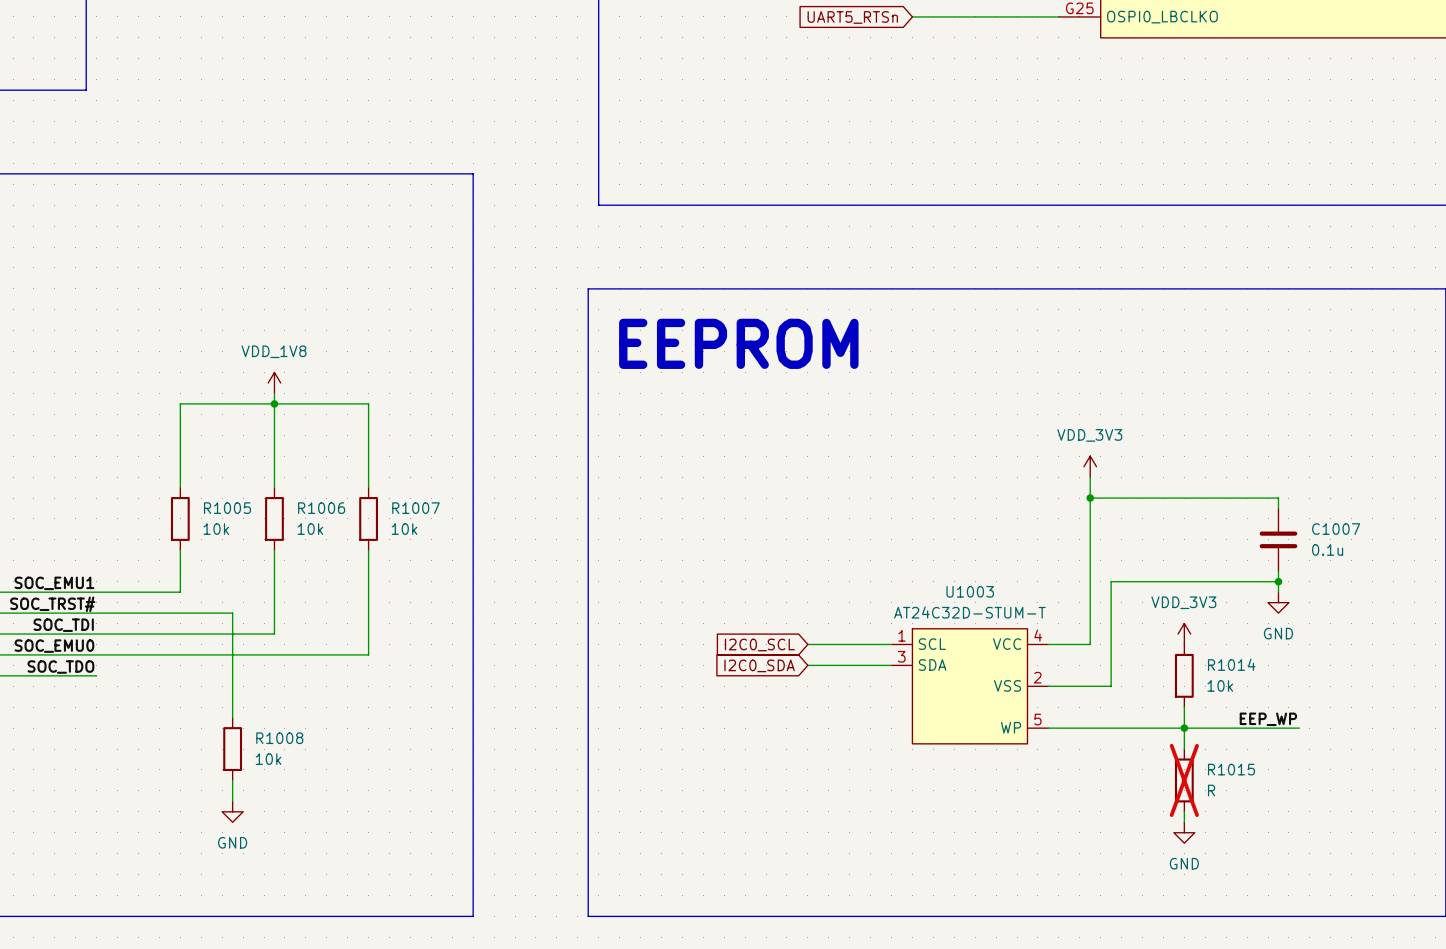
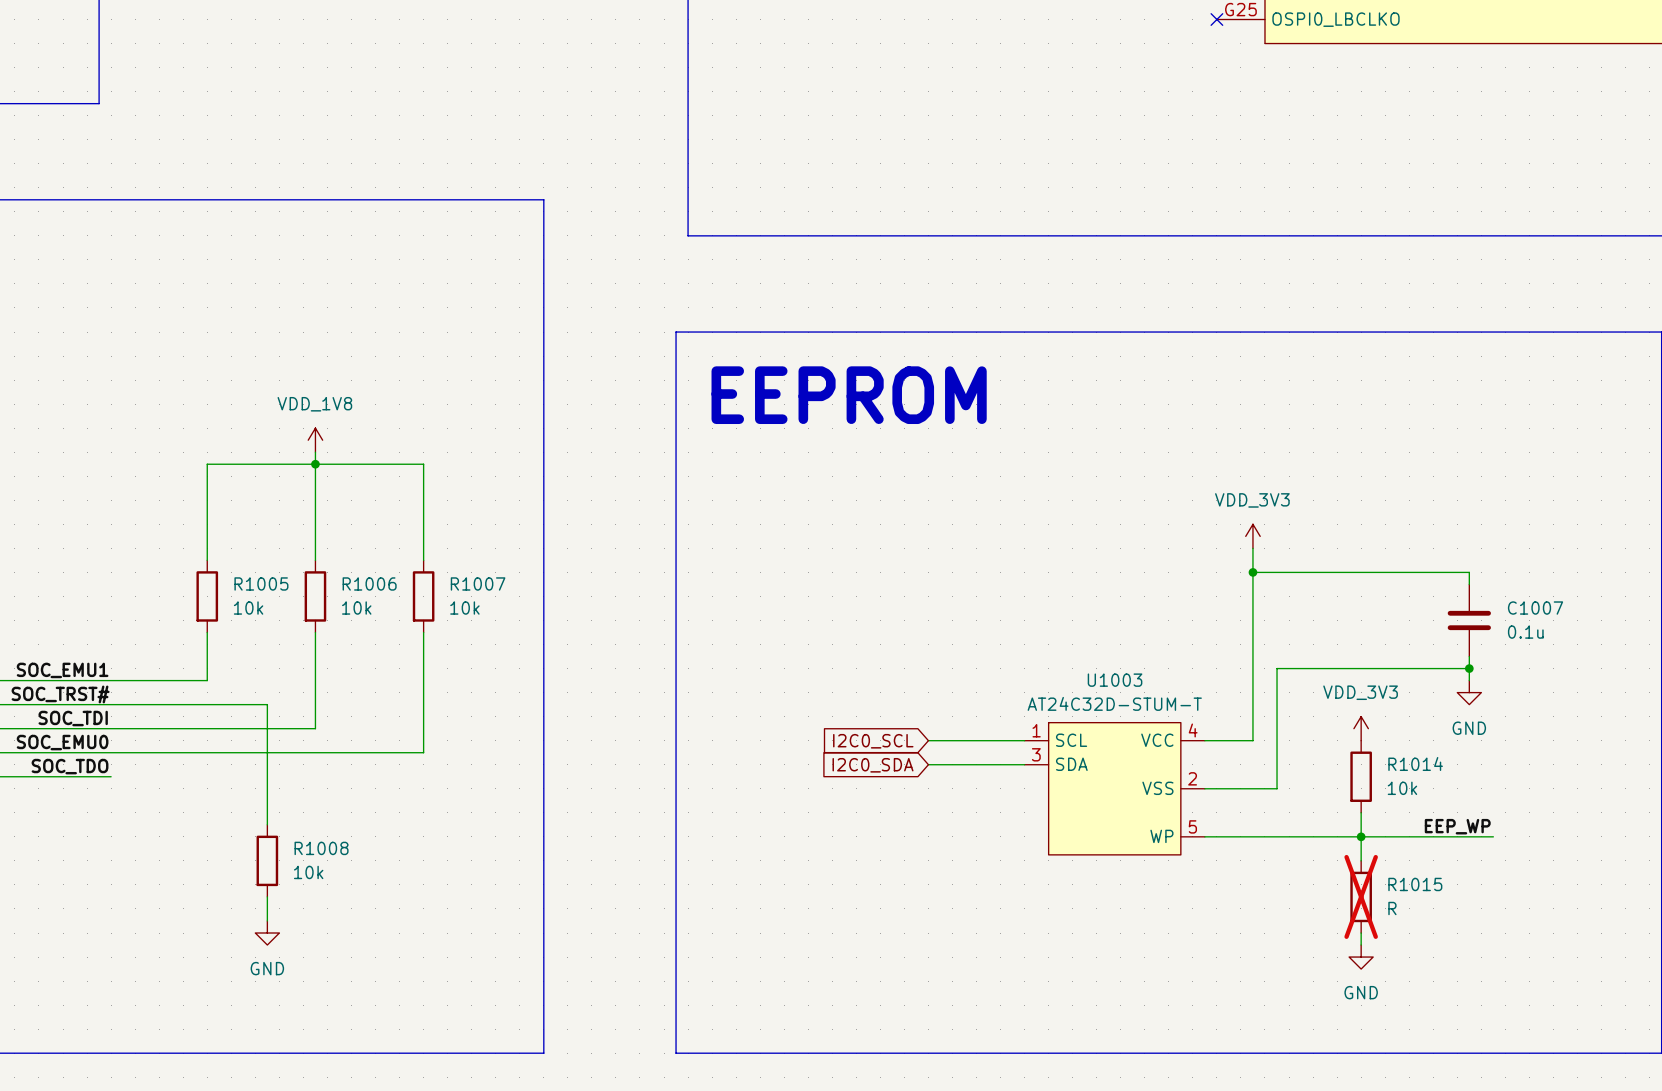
wire: (912, 16) (1058, 16) -> none
no-connect mark: none -> (1216, 19)
global label: UART5_RTSn (852, 17) -> none

